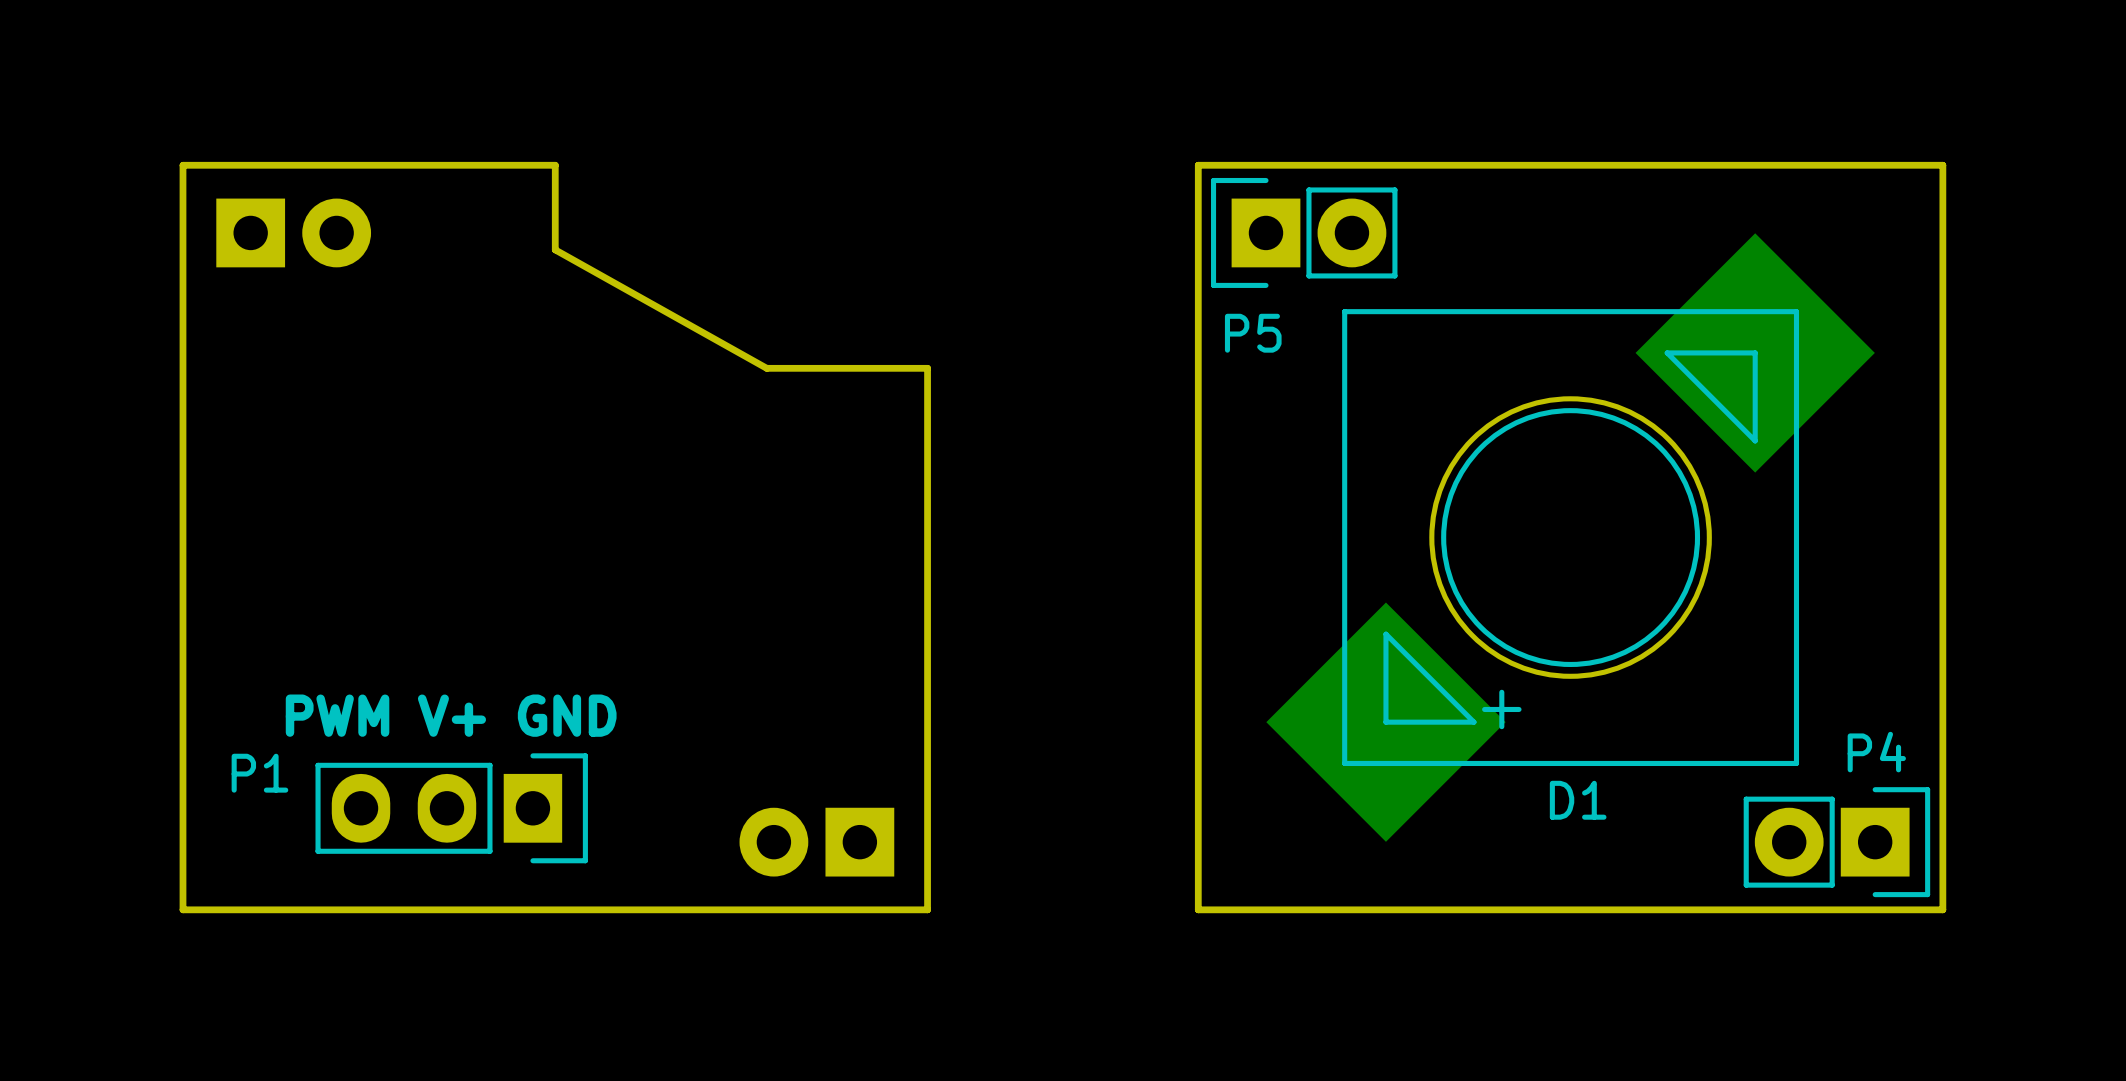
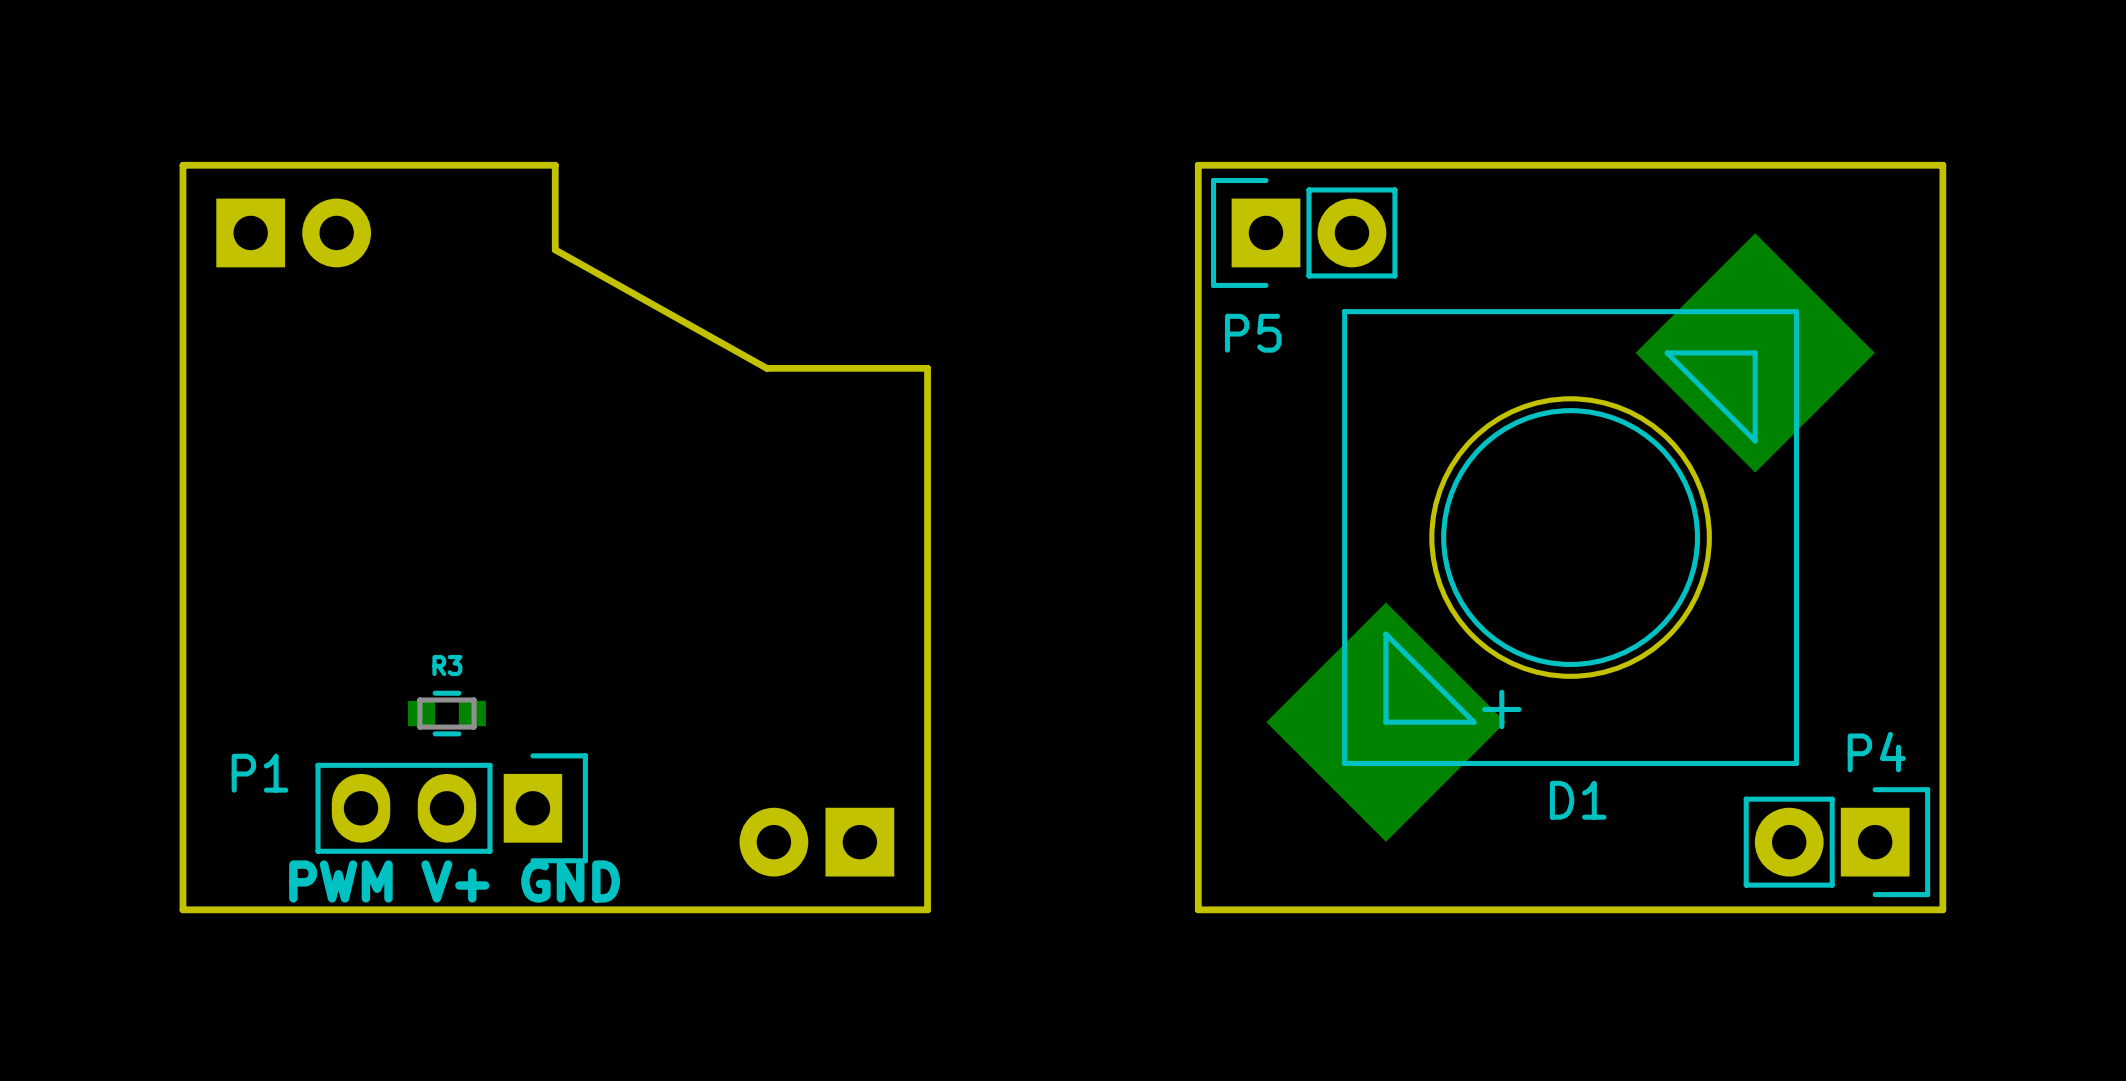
R3: none -> (446, 713)
text position: PWM V+ GND (451, 715) -> PWM V+ GND (454, 881)

